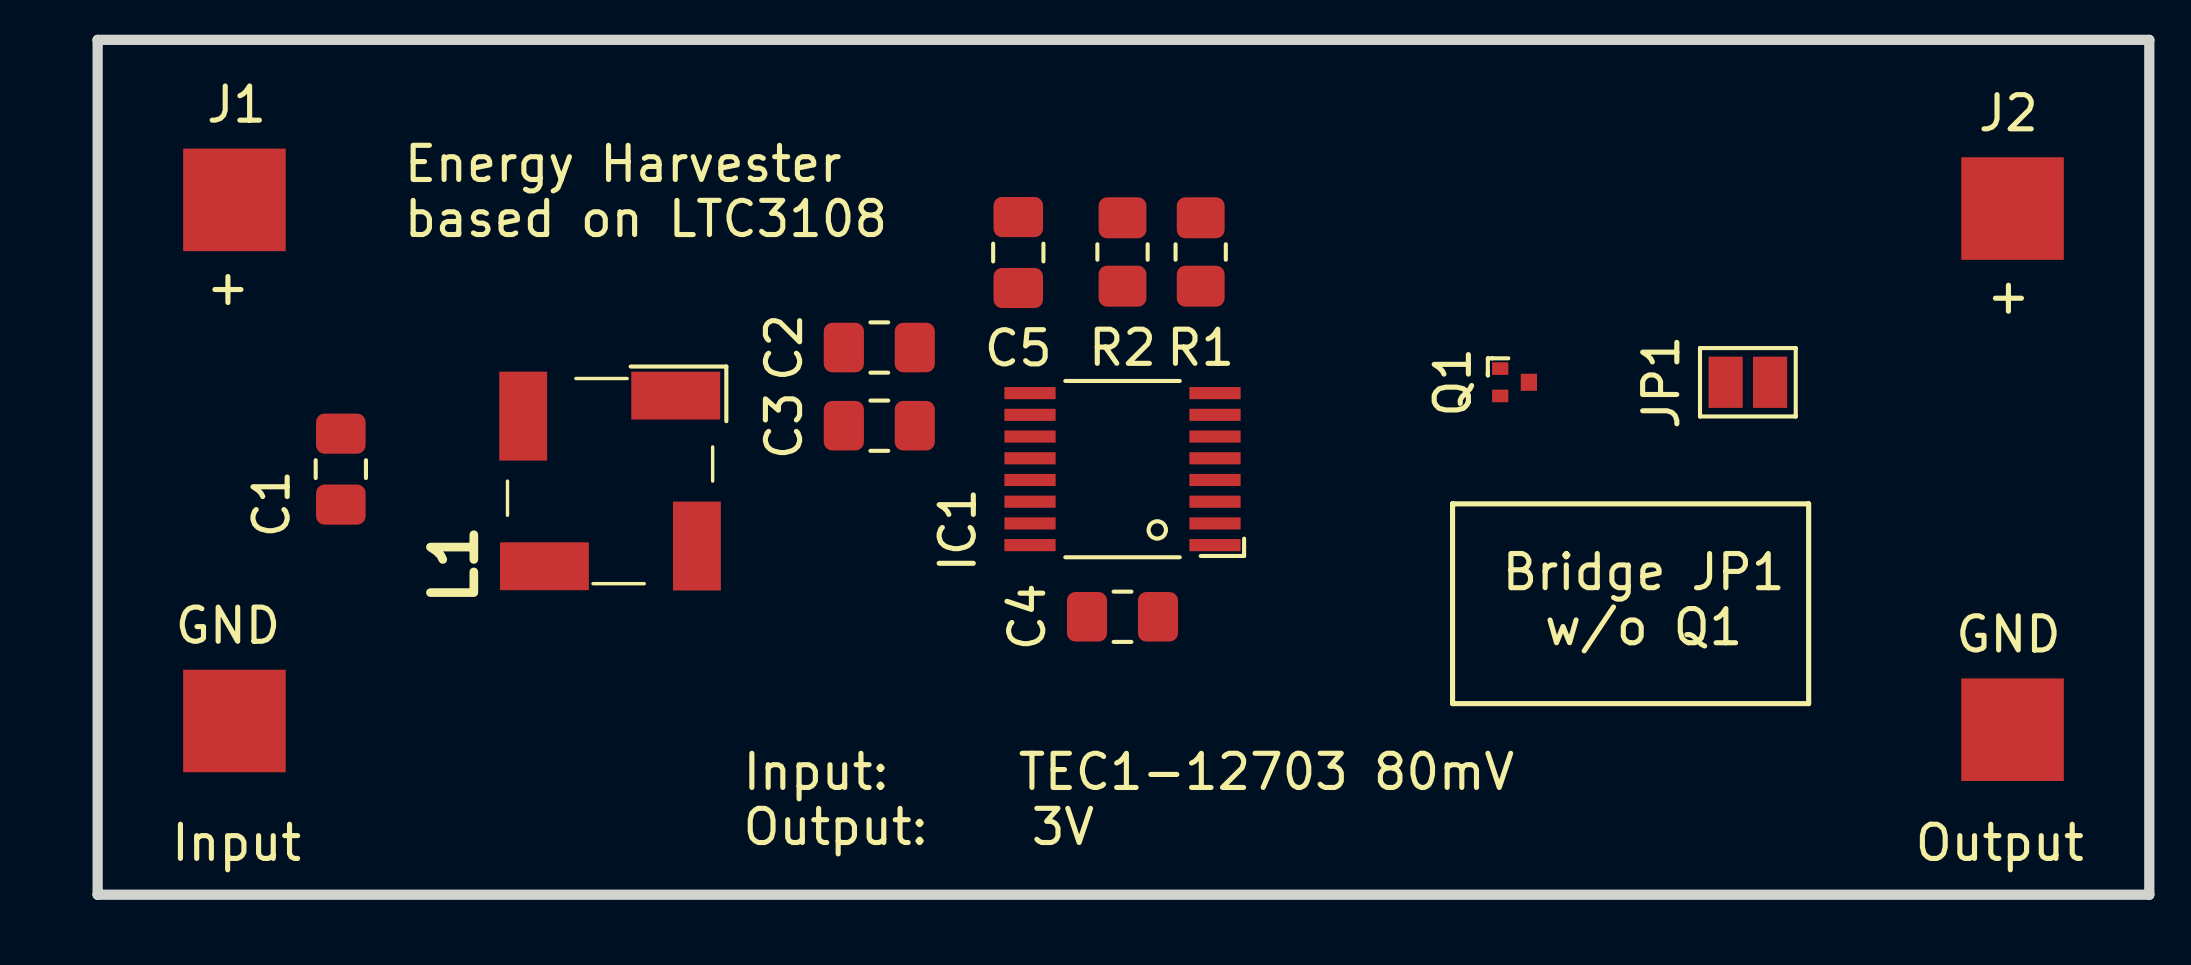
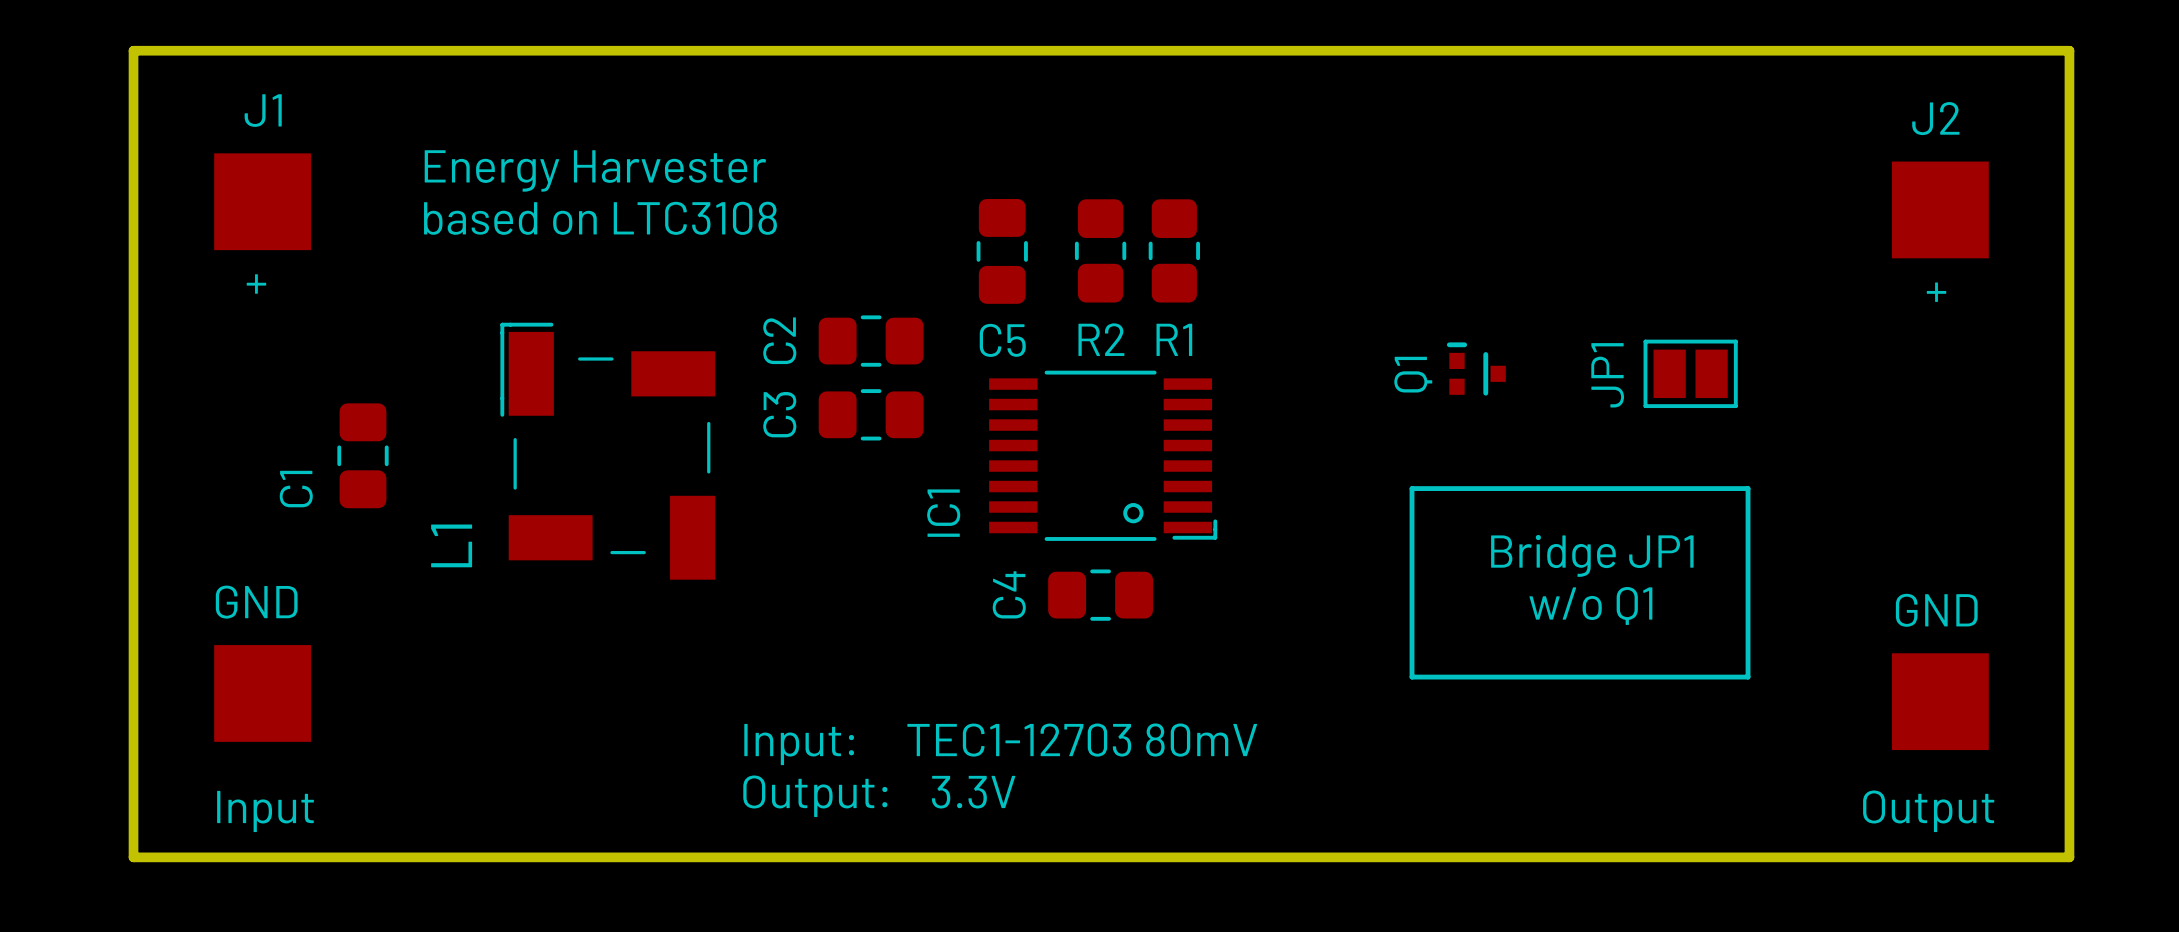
Q1 footprint: [1485, 356, 1538, 403] -> [1446, 342, 1506, 396]
L1 footprint: [499, 364, 729, 591] -> [500, 322, 716, 580]
text: Output: 3V (920, 831) -> Output: 3.3V (879, 796)

